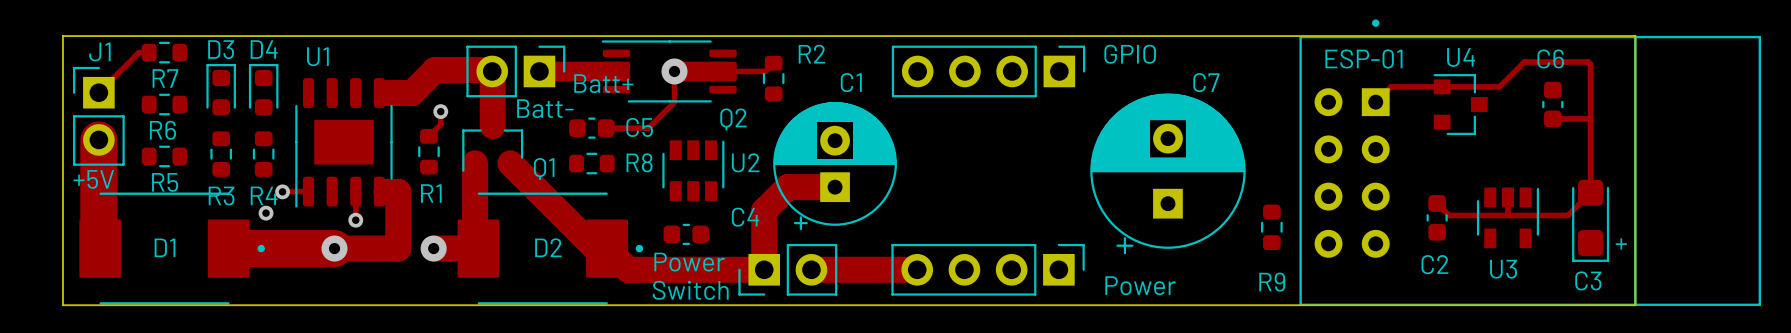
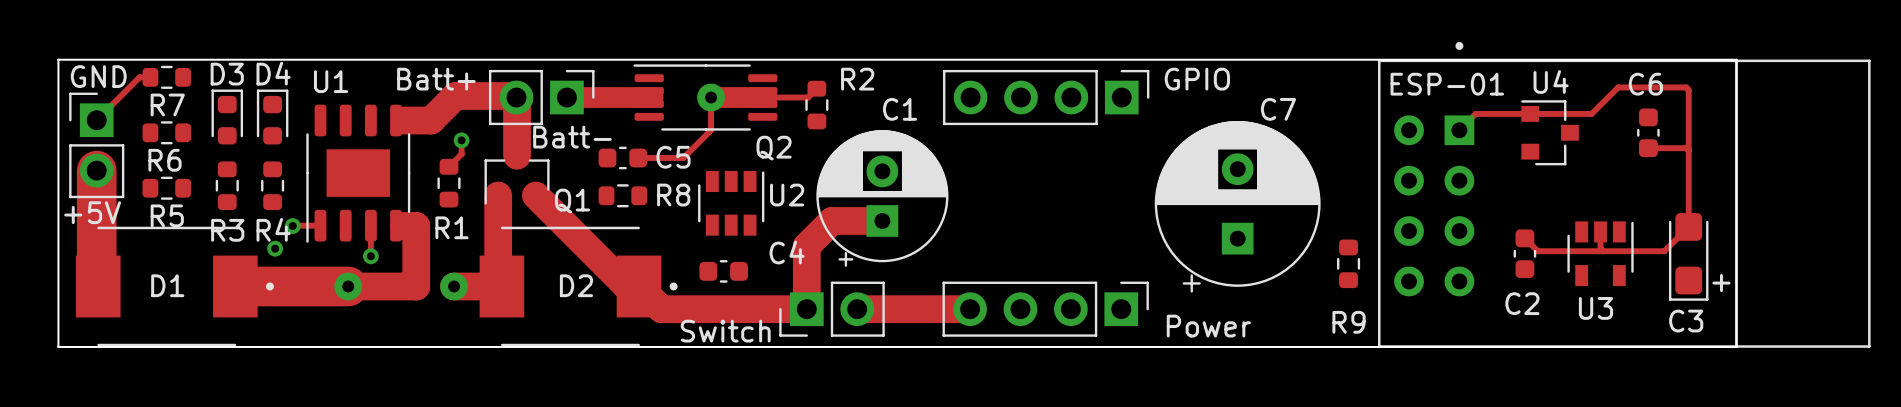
J1 name: J1 (99, 51) -> GND (98, 76)
Batt+ name position: Batt+ (603, 83) -> Batt+ (436, 79)
Power name: Power (689, 262) -> Switch (725, 331)
text: Switch (690, 290) -> none

